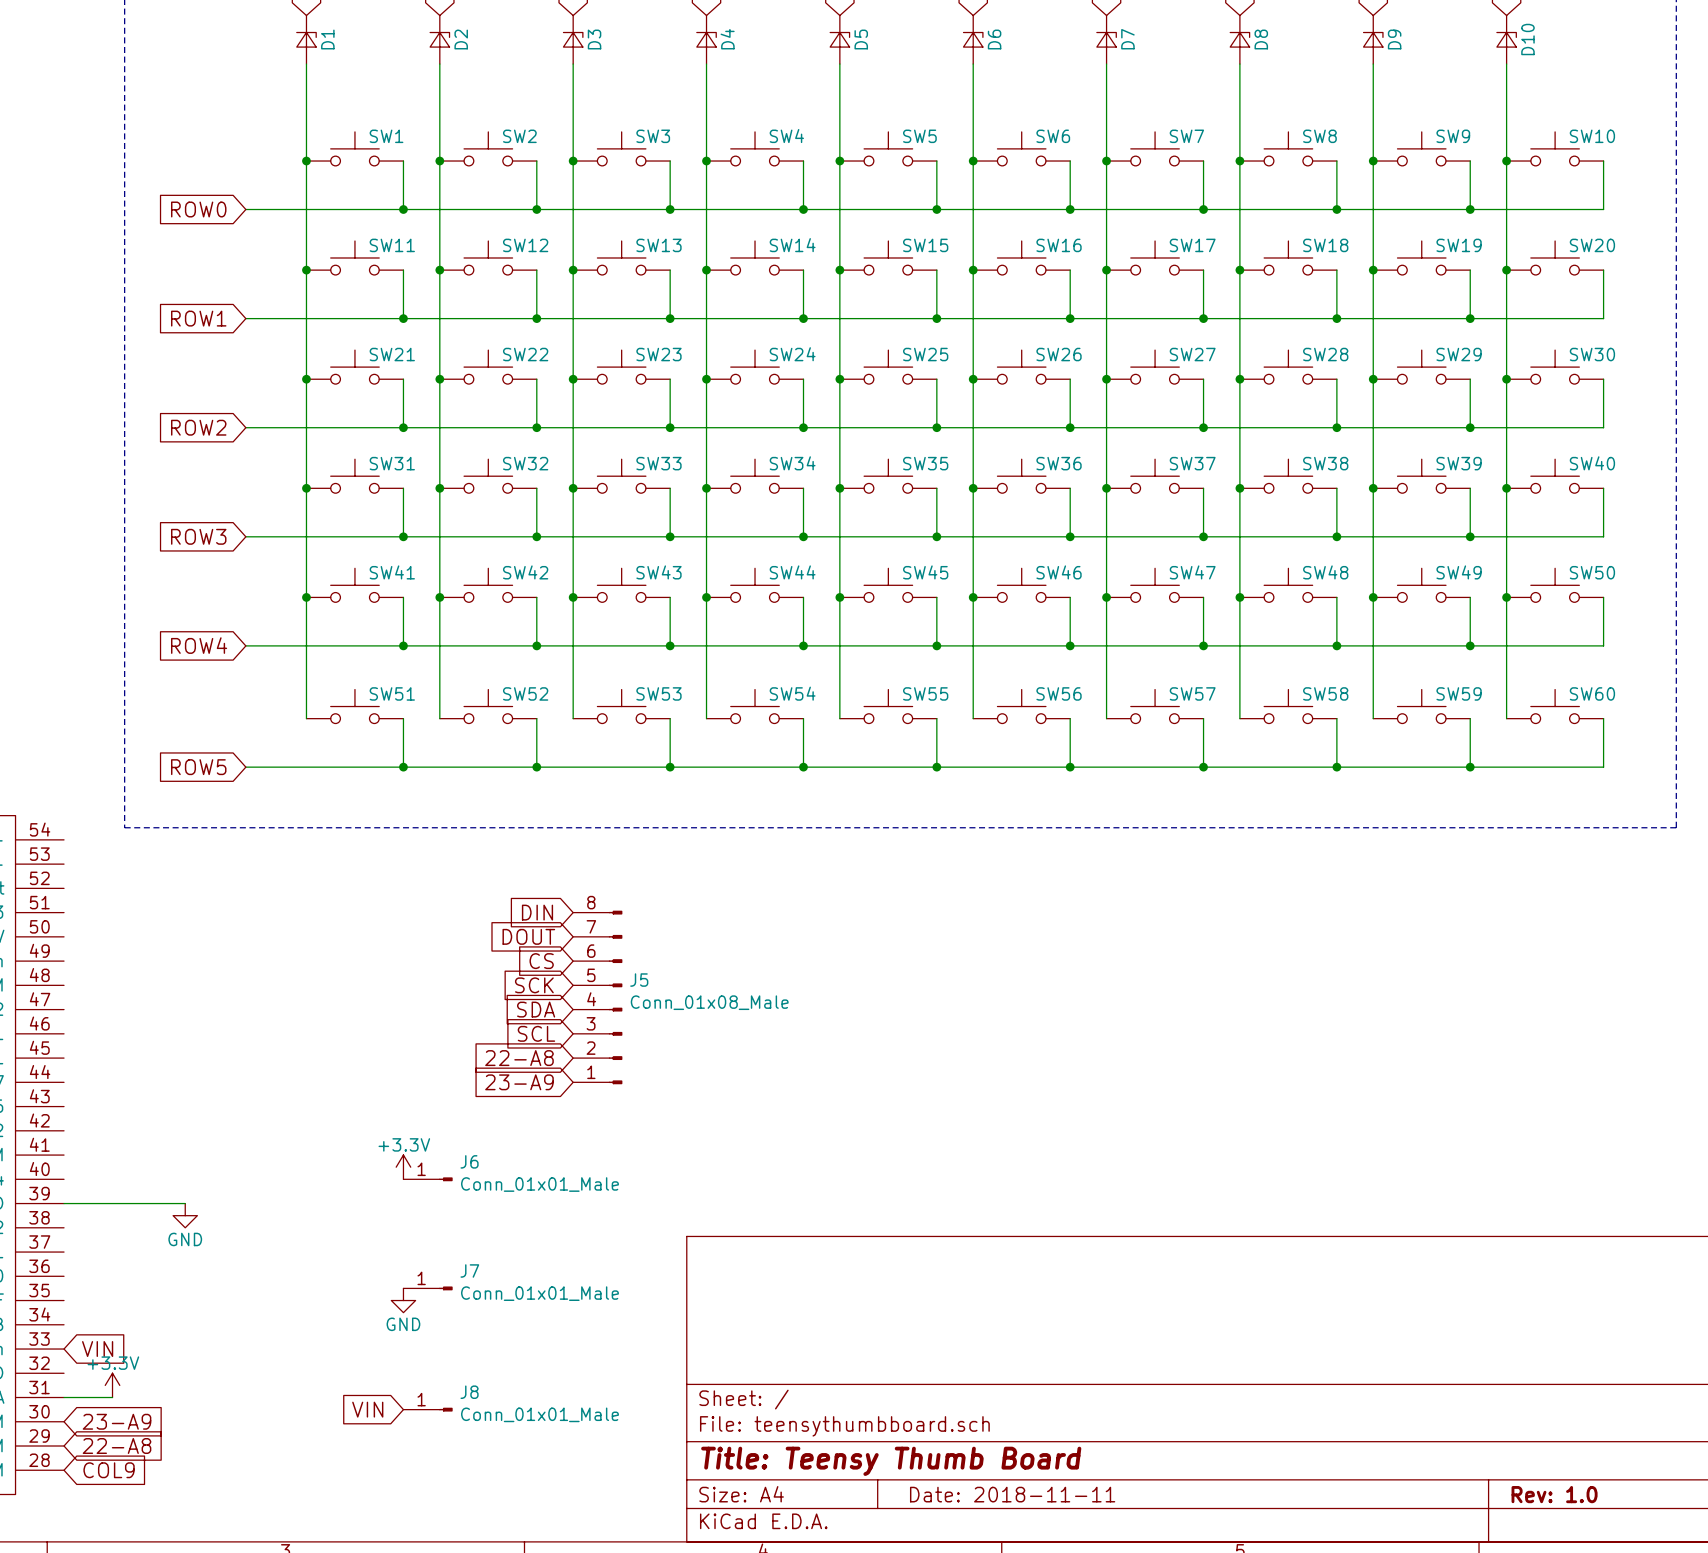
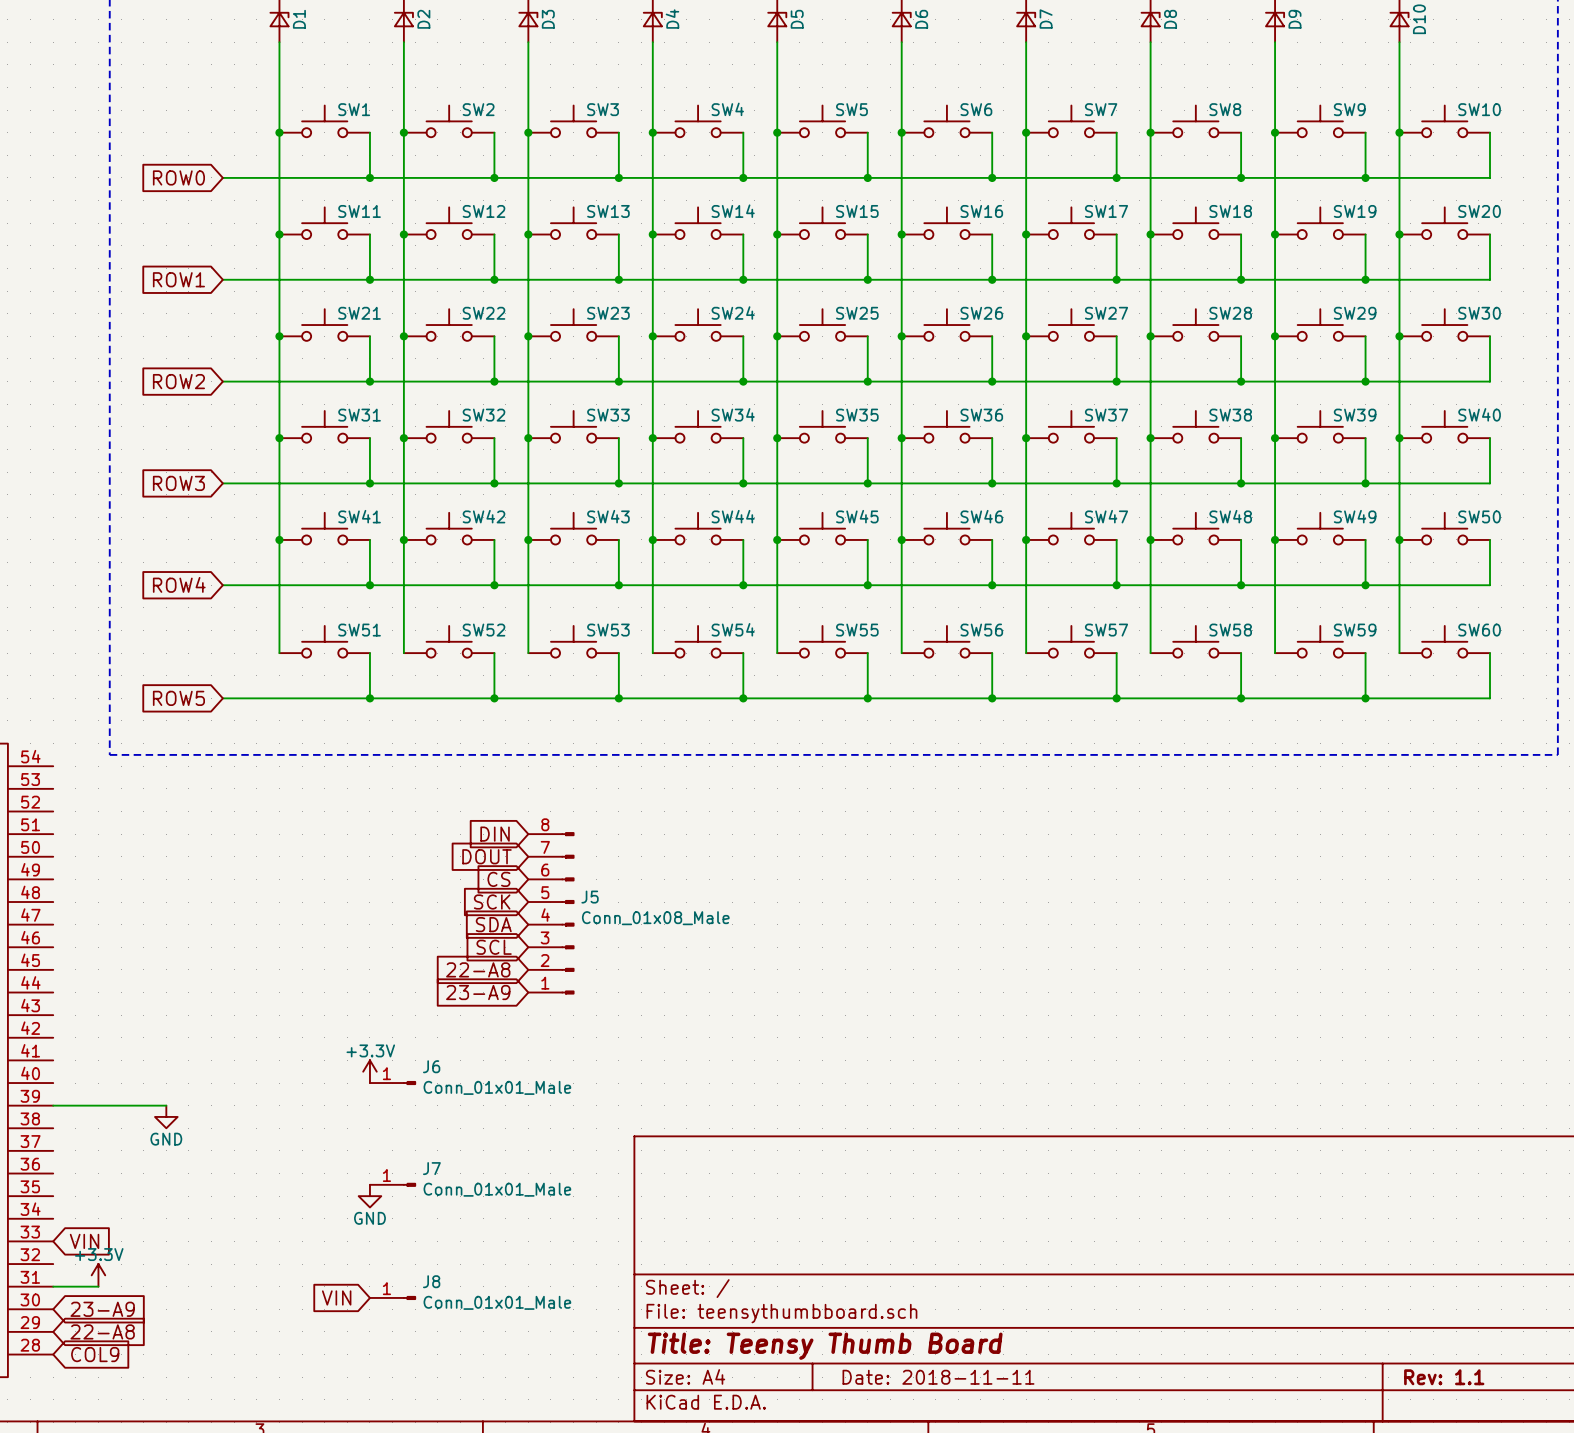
title block: Rev: 1.0 (1554, 1494) -> Rev: 1.1 (1444, 1377)

